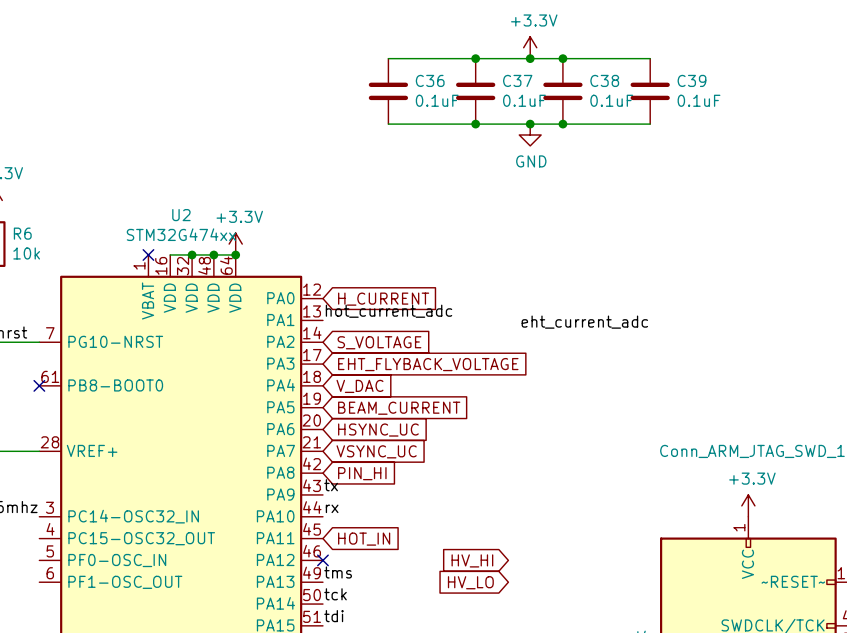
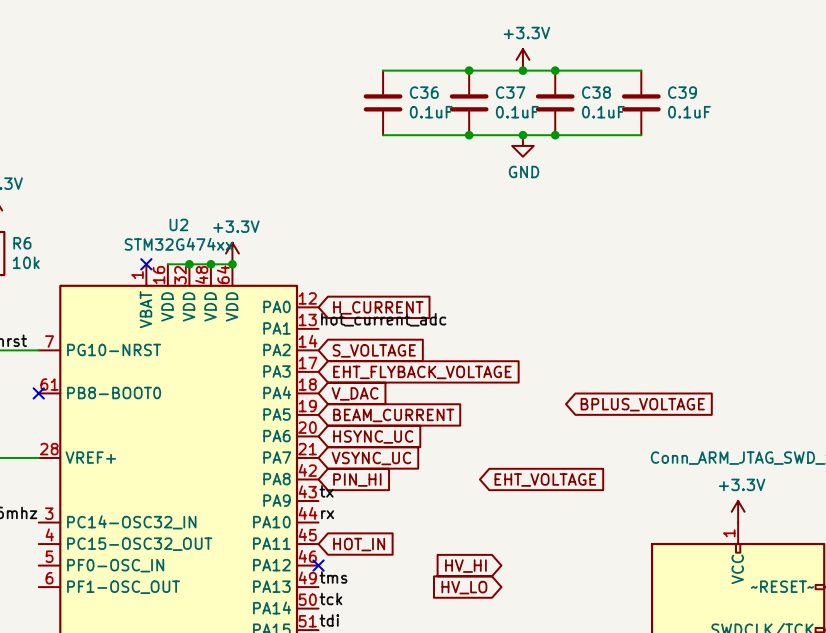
label: eht_current_adc (584, 322) -> none
global label: none -> BPLUS_VOLTAGE (642, 404)
global label: none -> EHT_VOLTAGE (545, 480)

